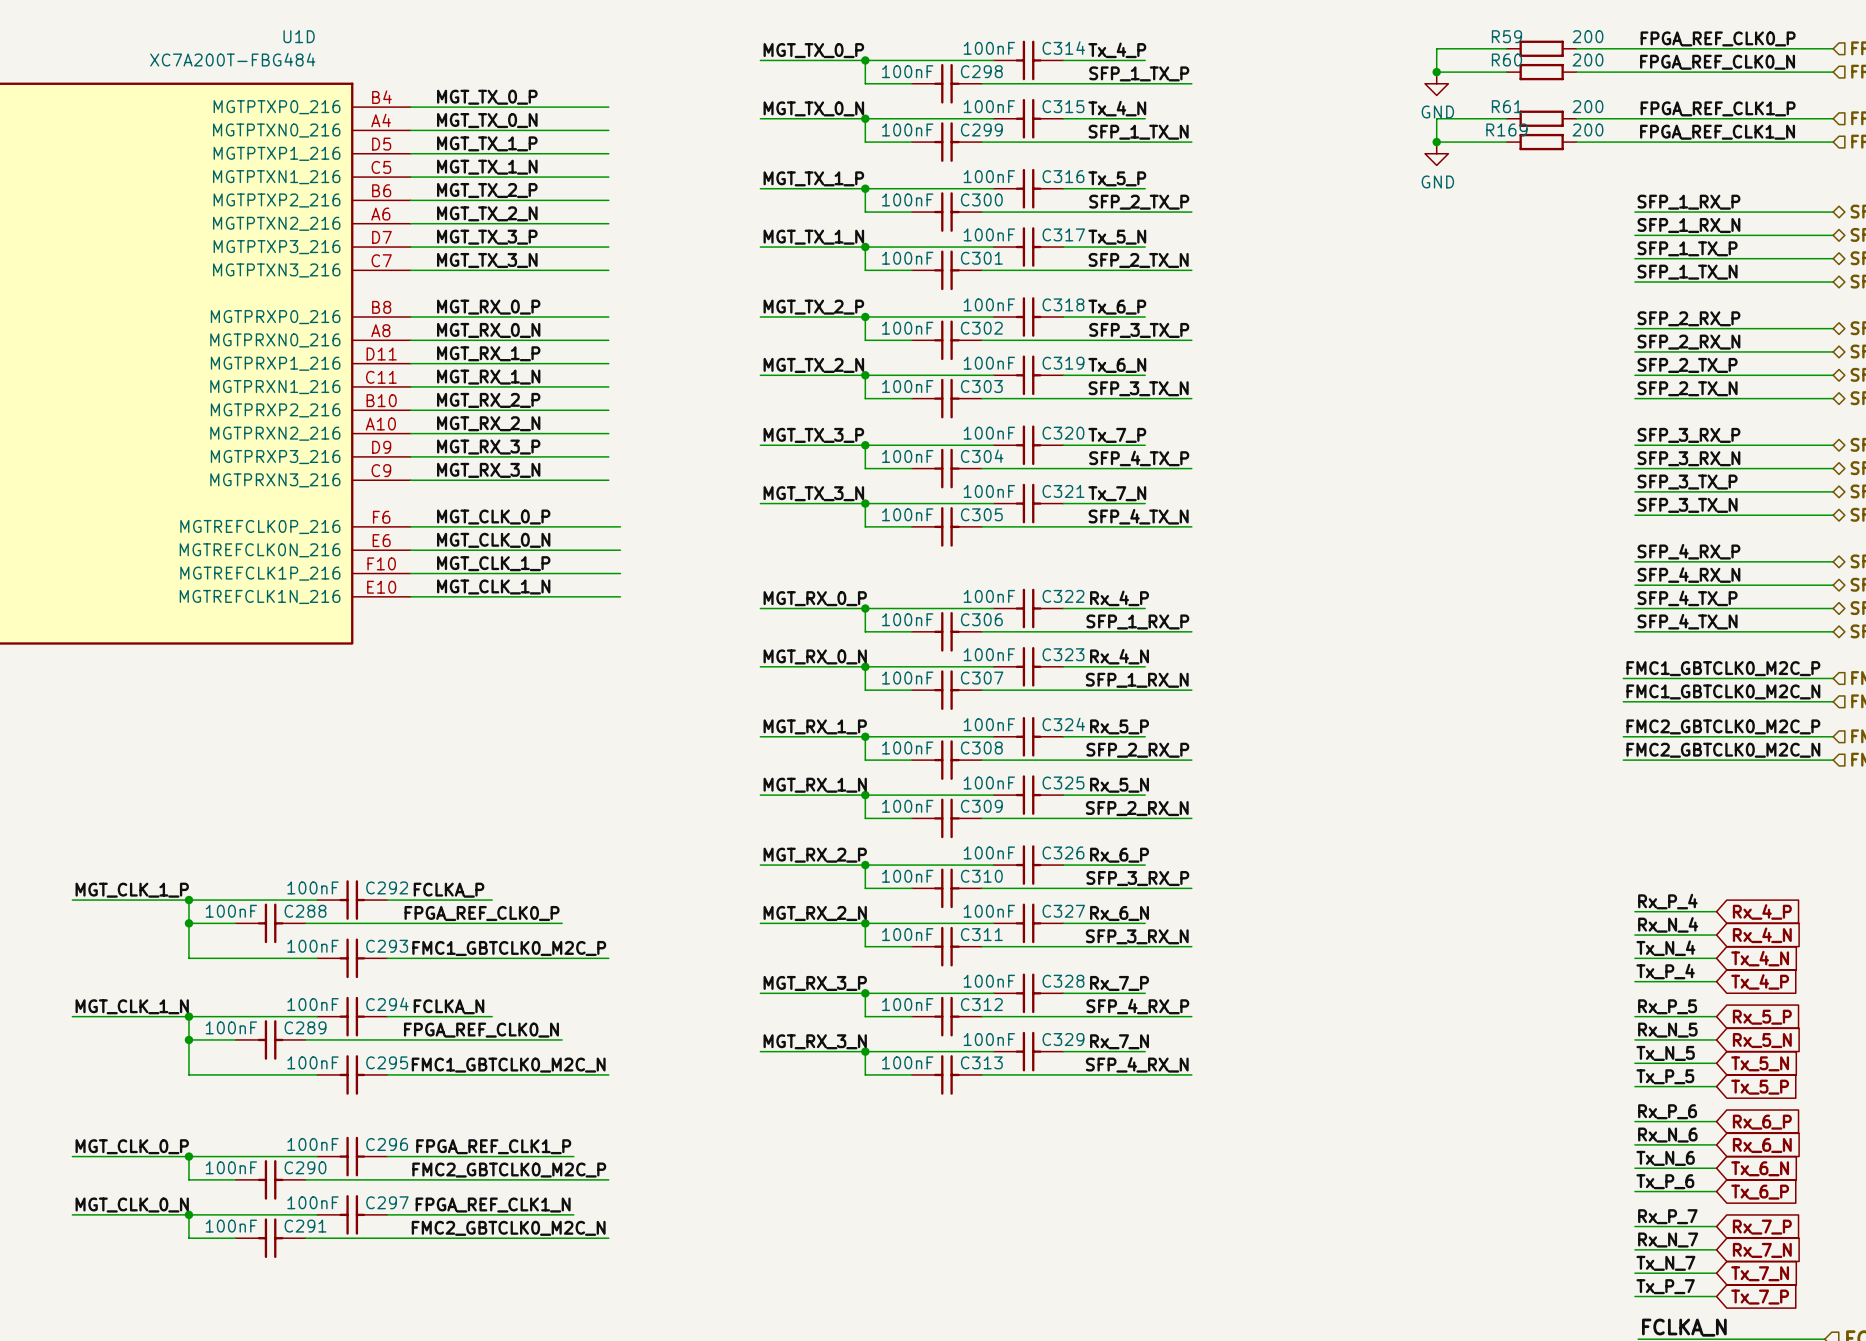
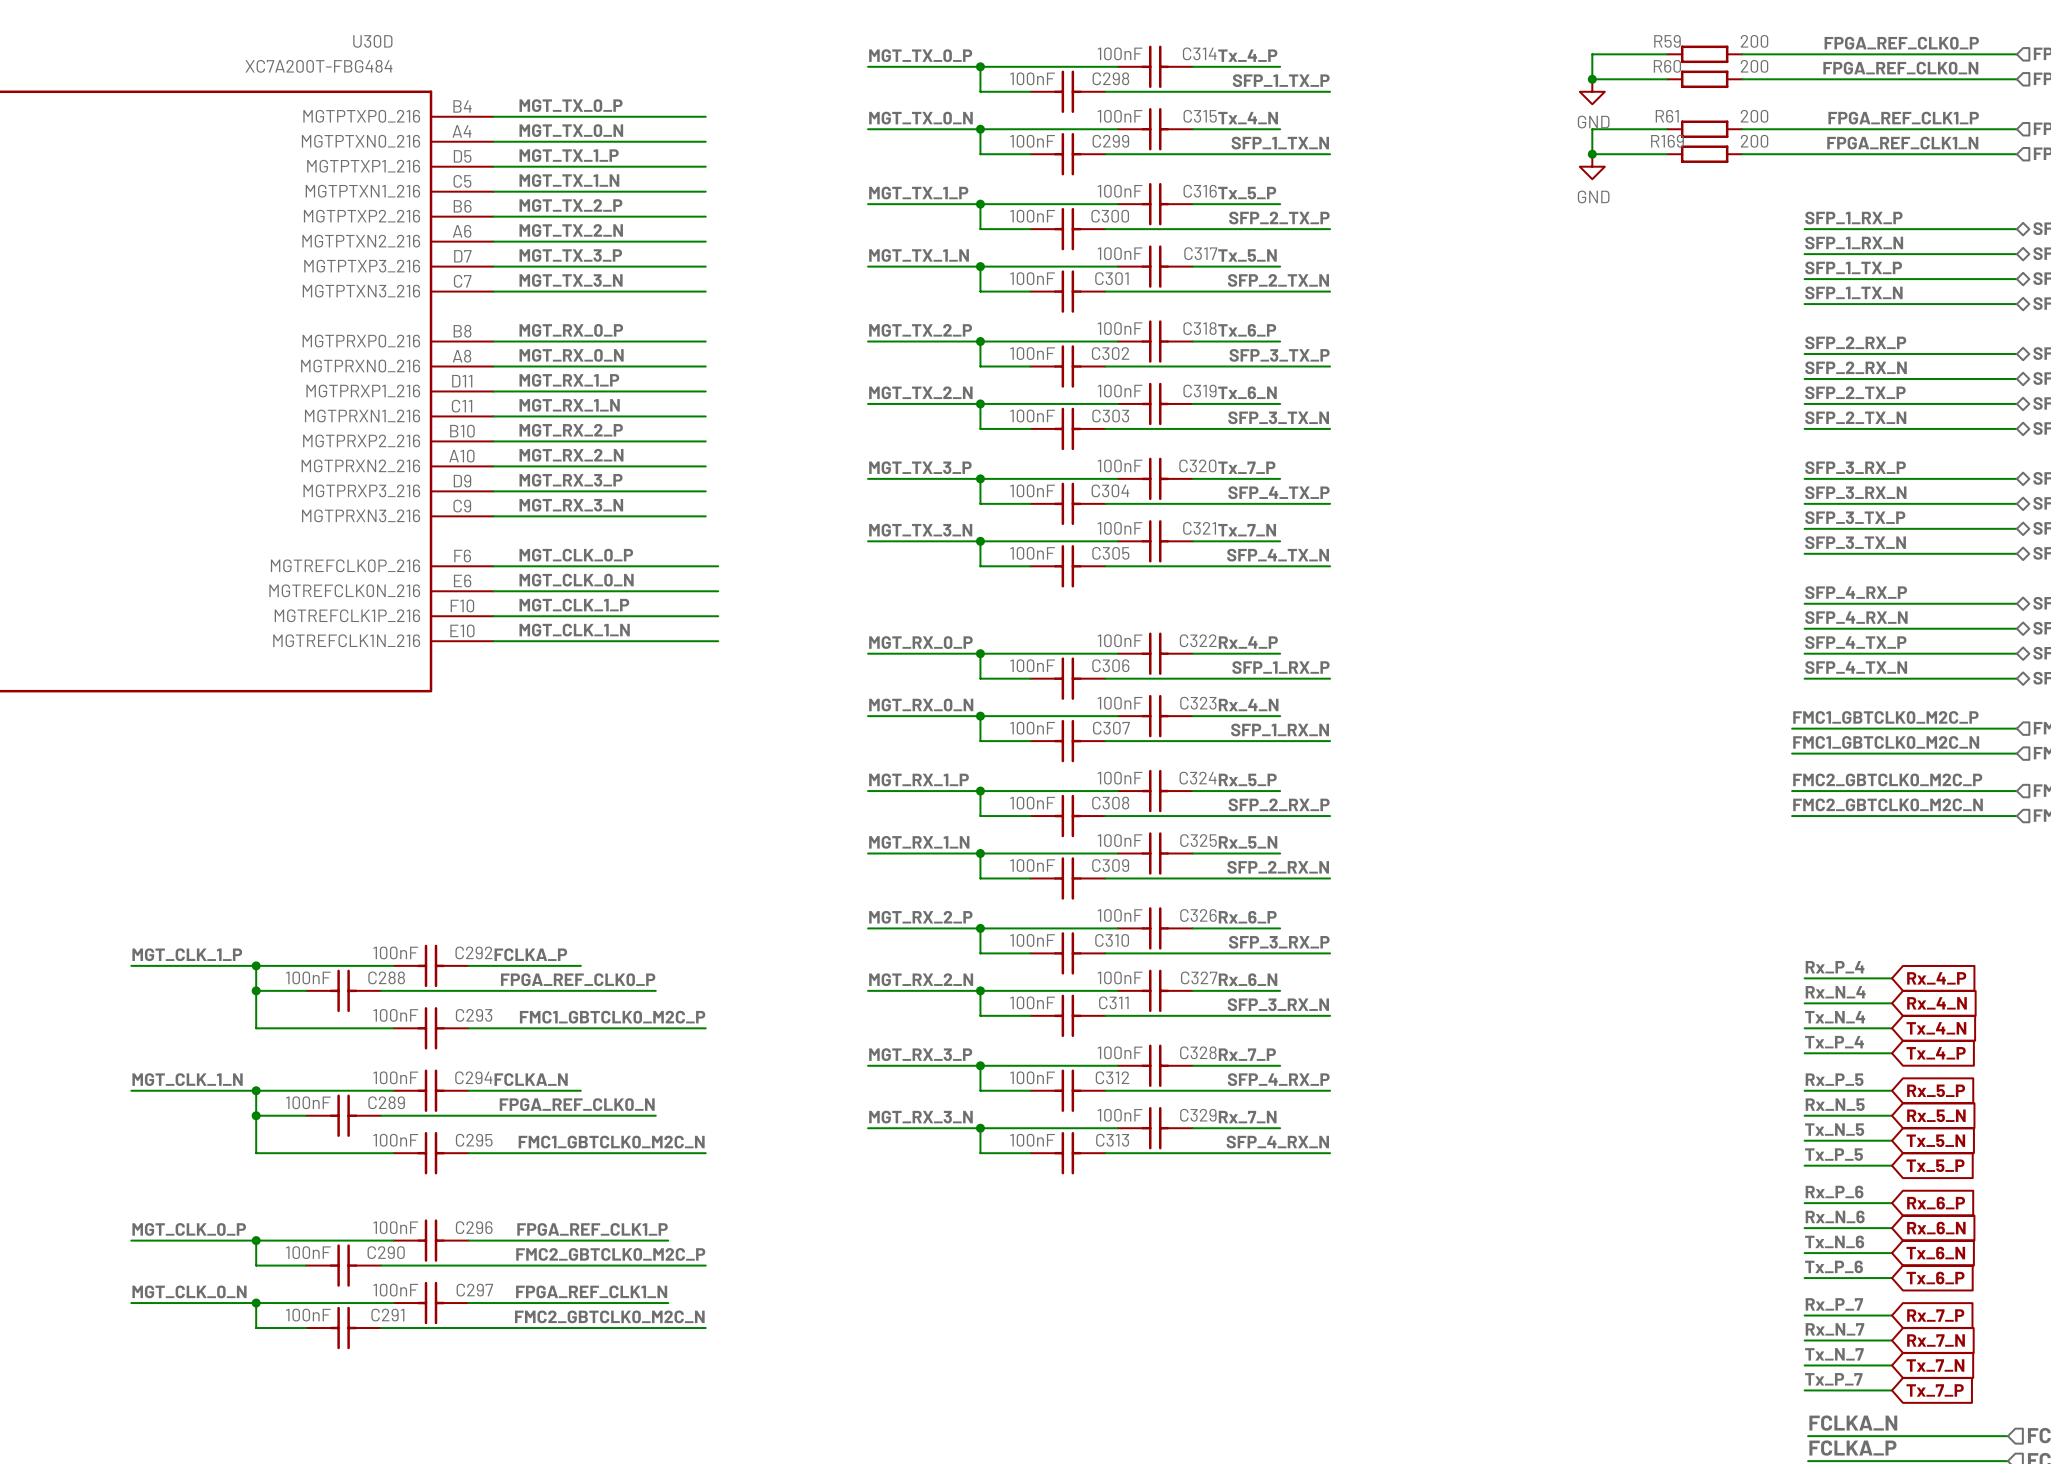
U1D name: U1D (299, 36) -> U30D (372, 41)

